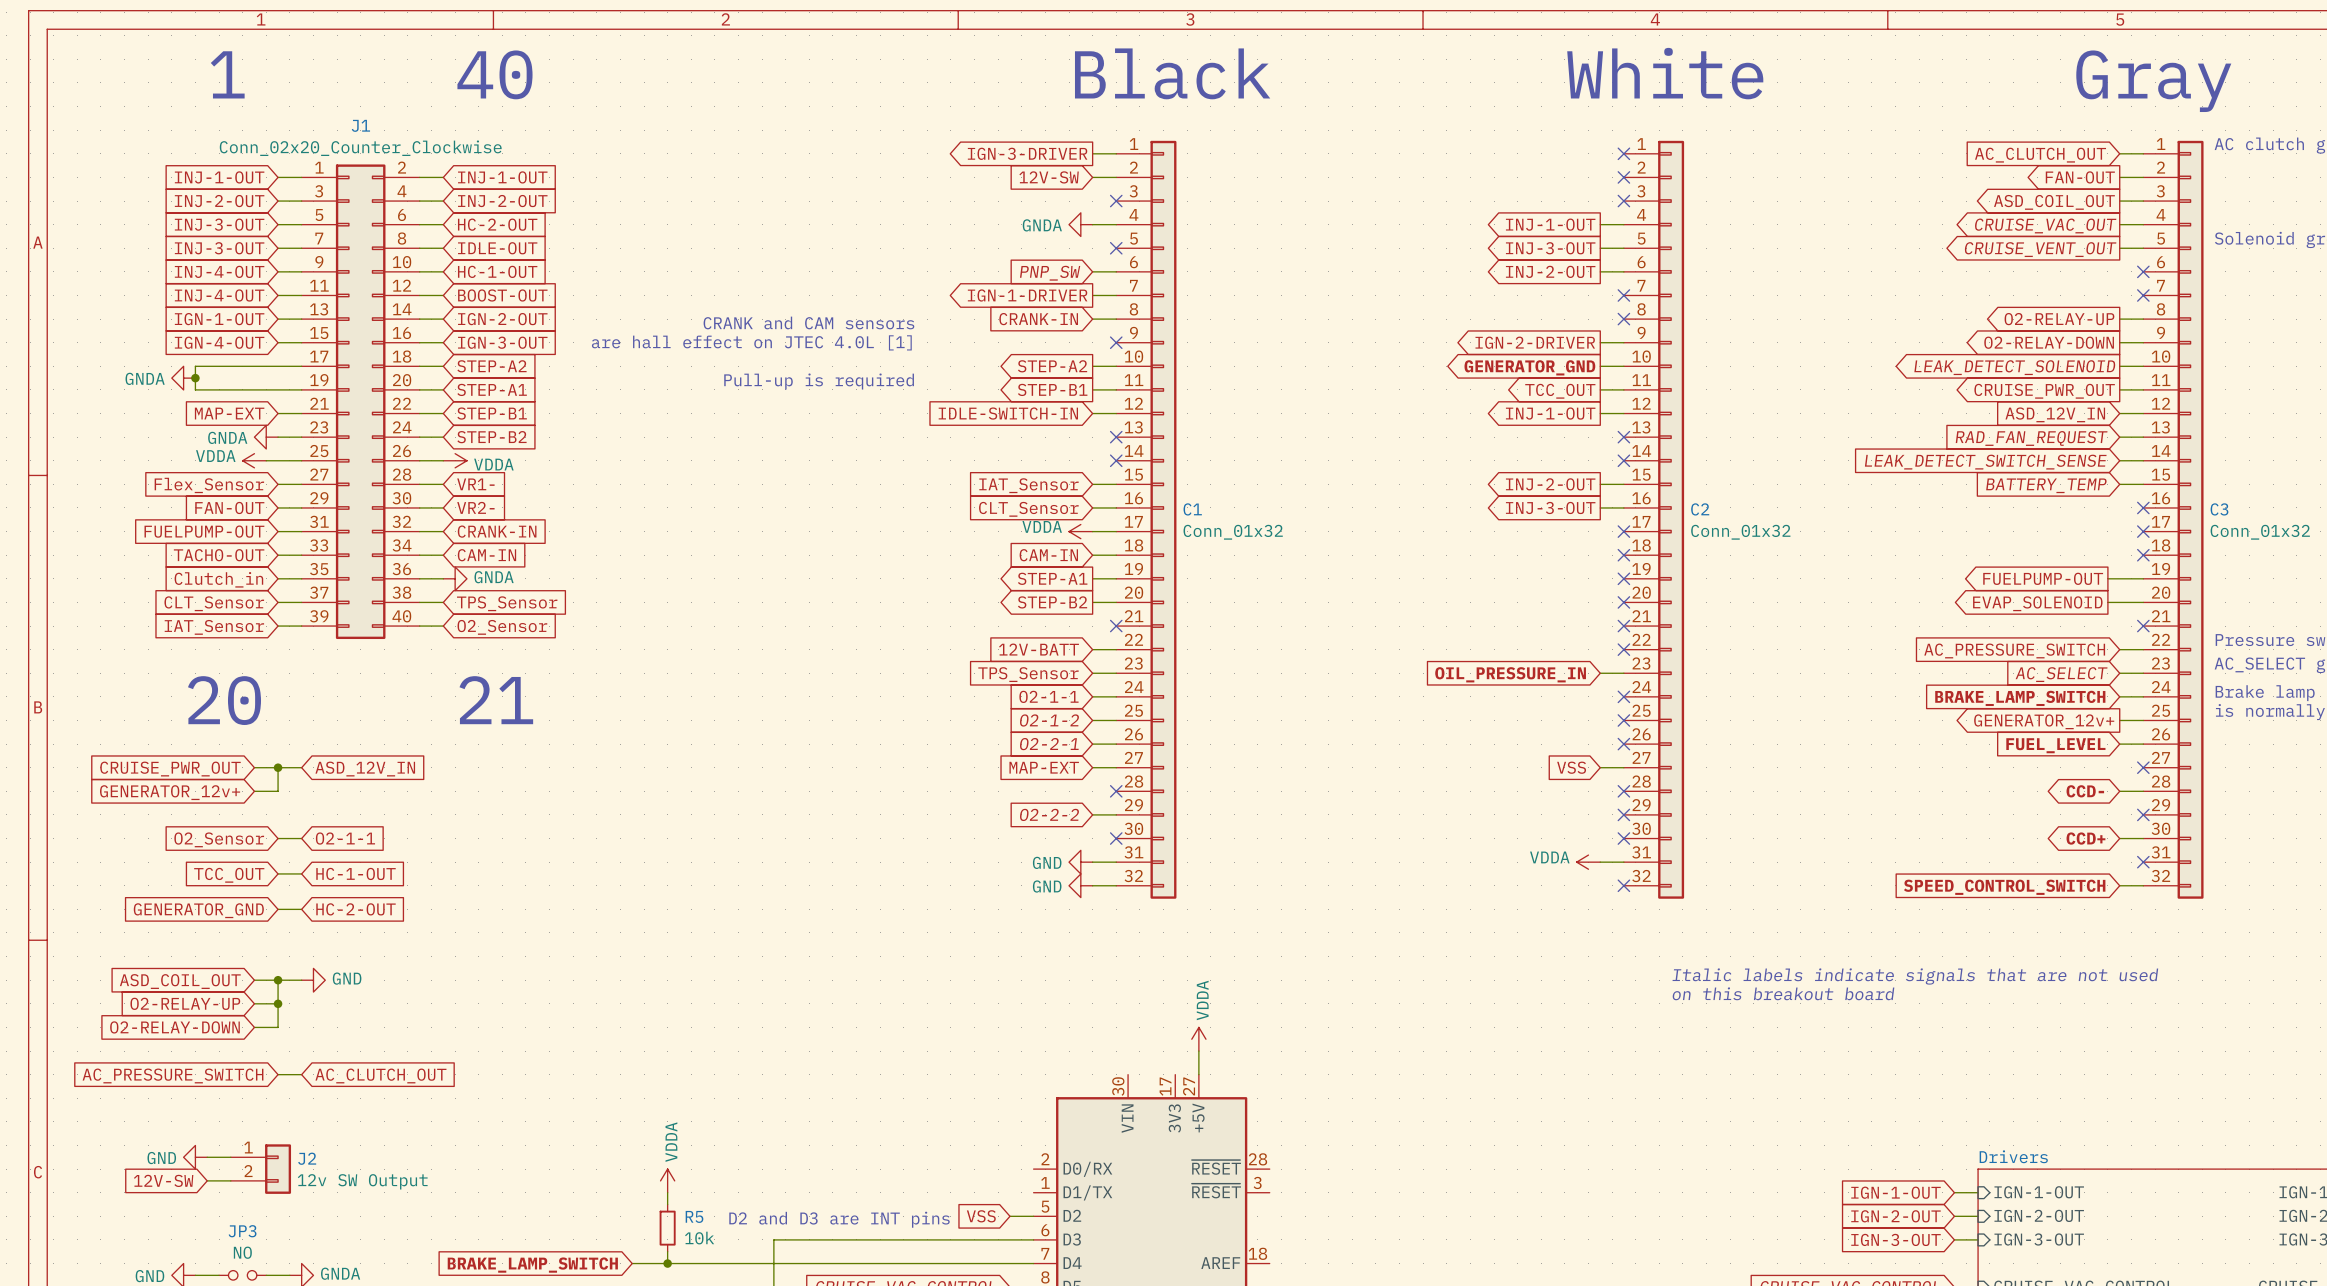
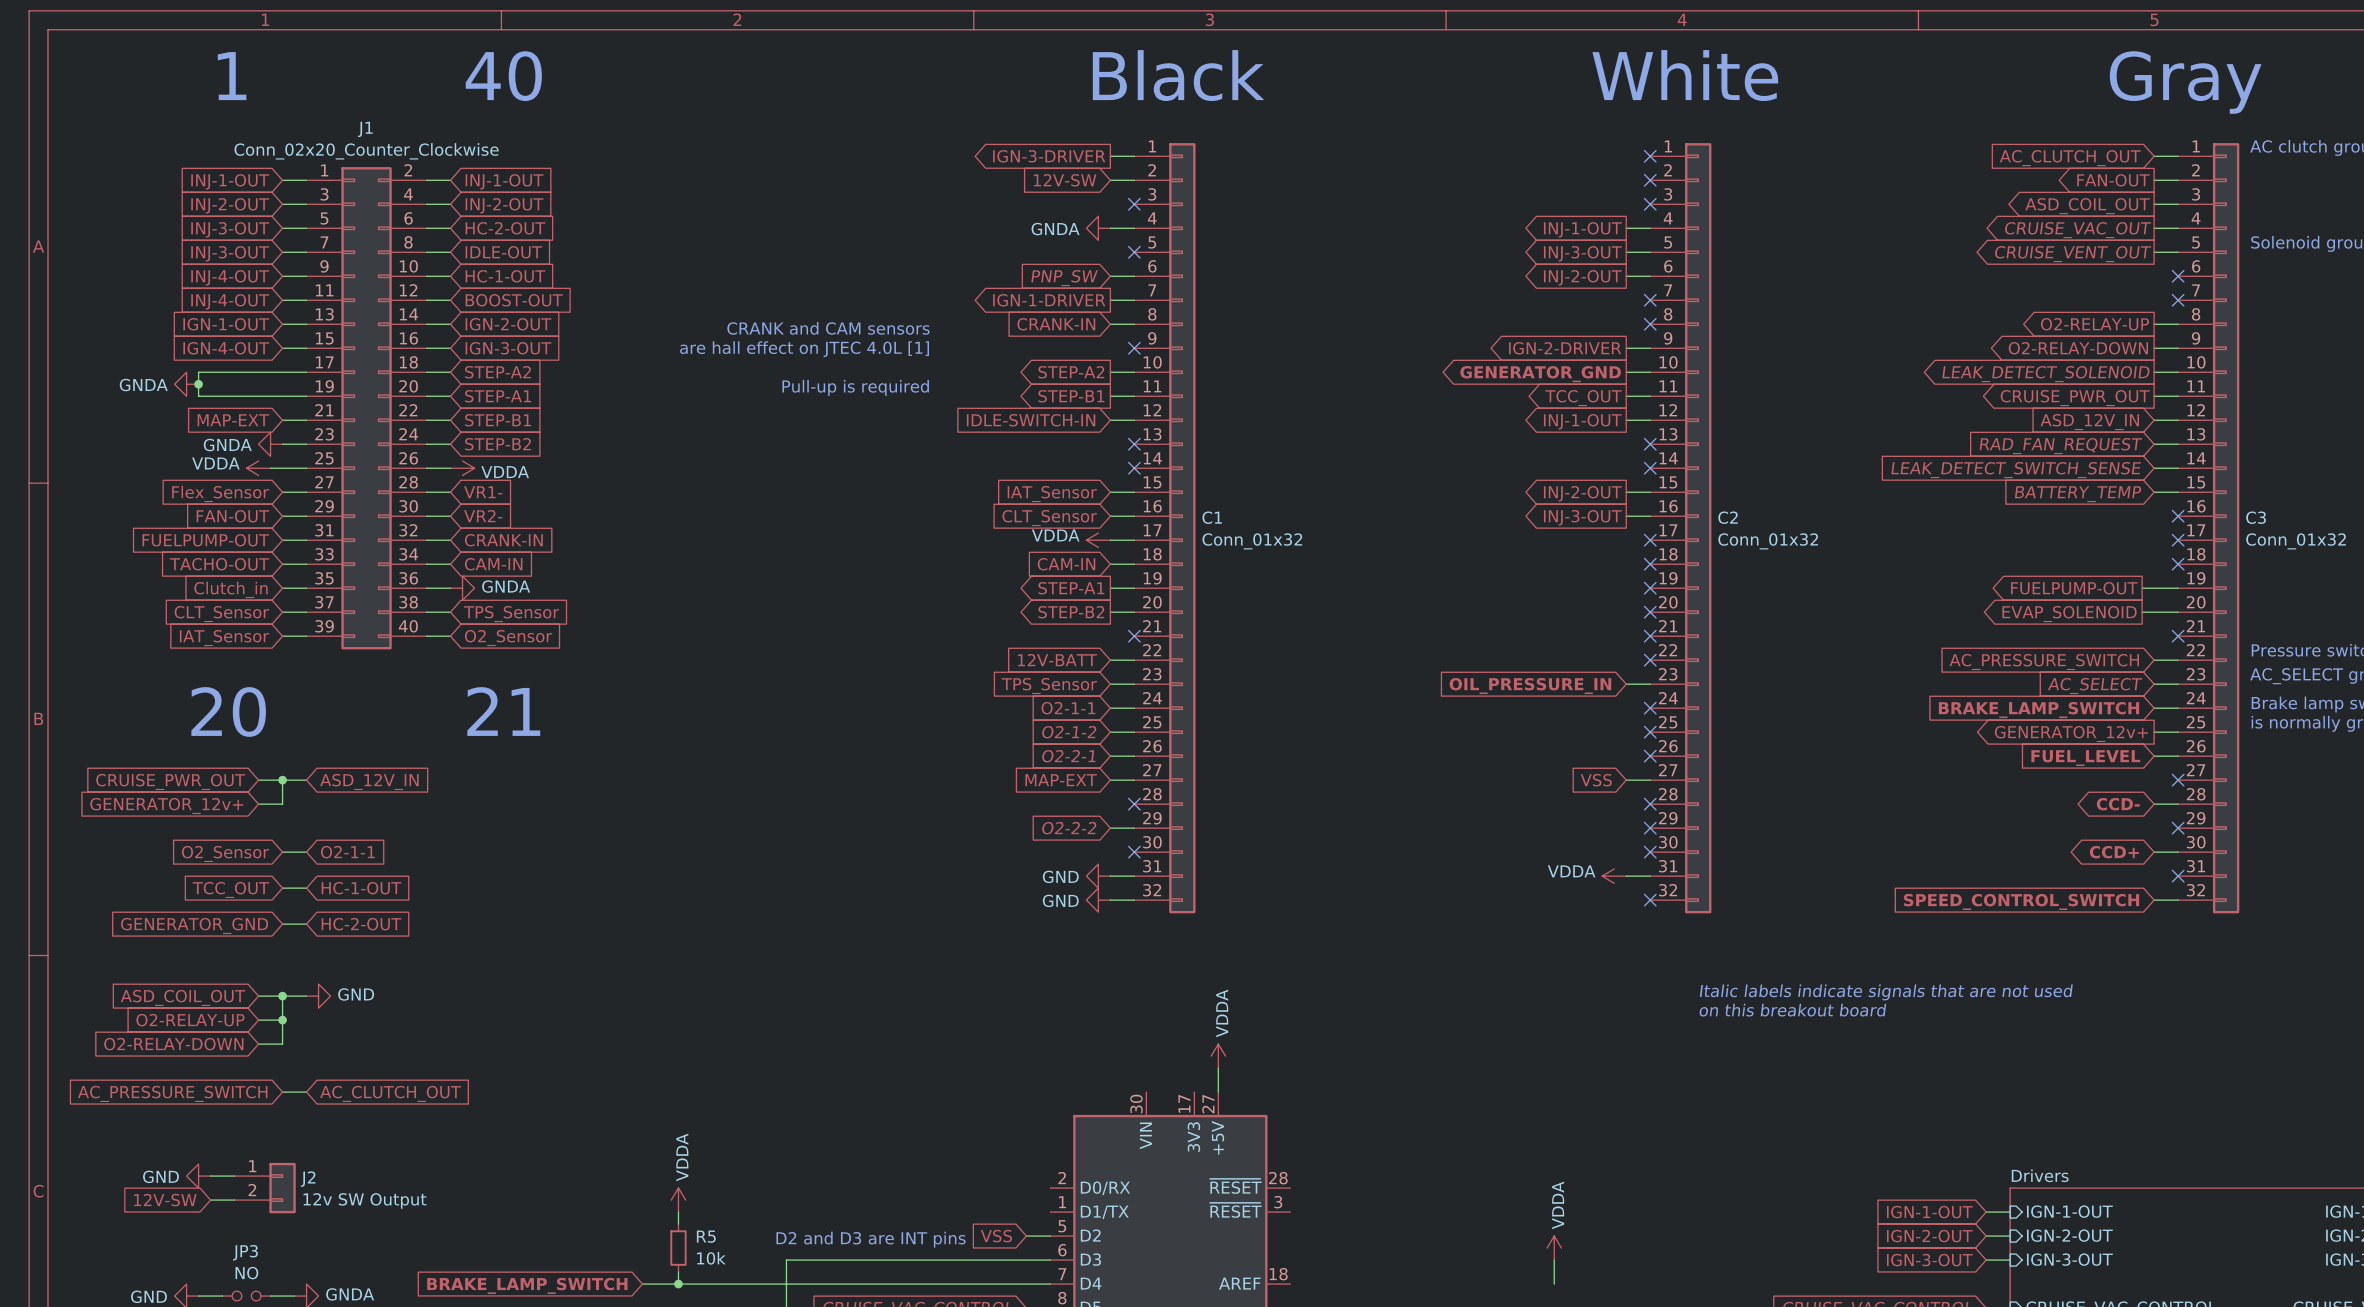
power symbol: none -> VDDA (1554, 1248)
wire: none -> (1554, 1260) (1554, 1284)

